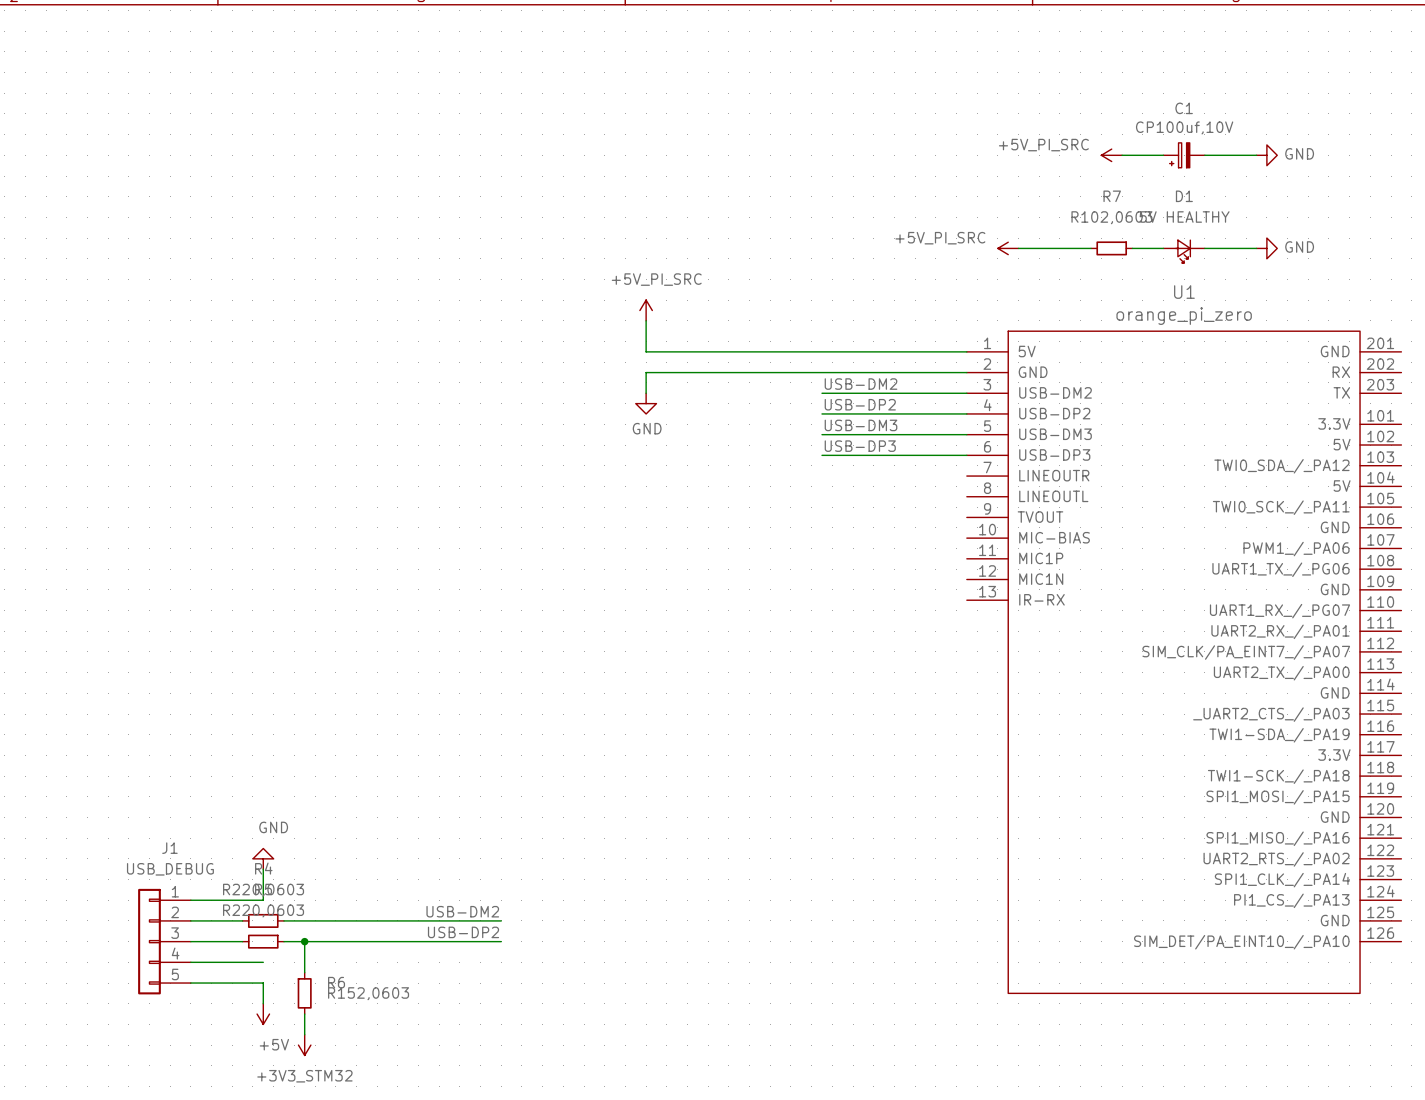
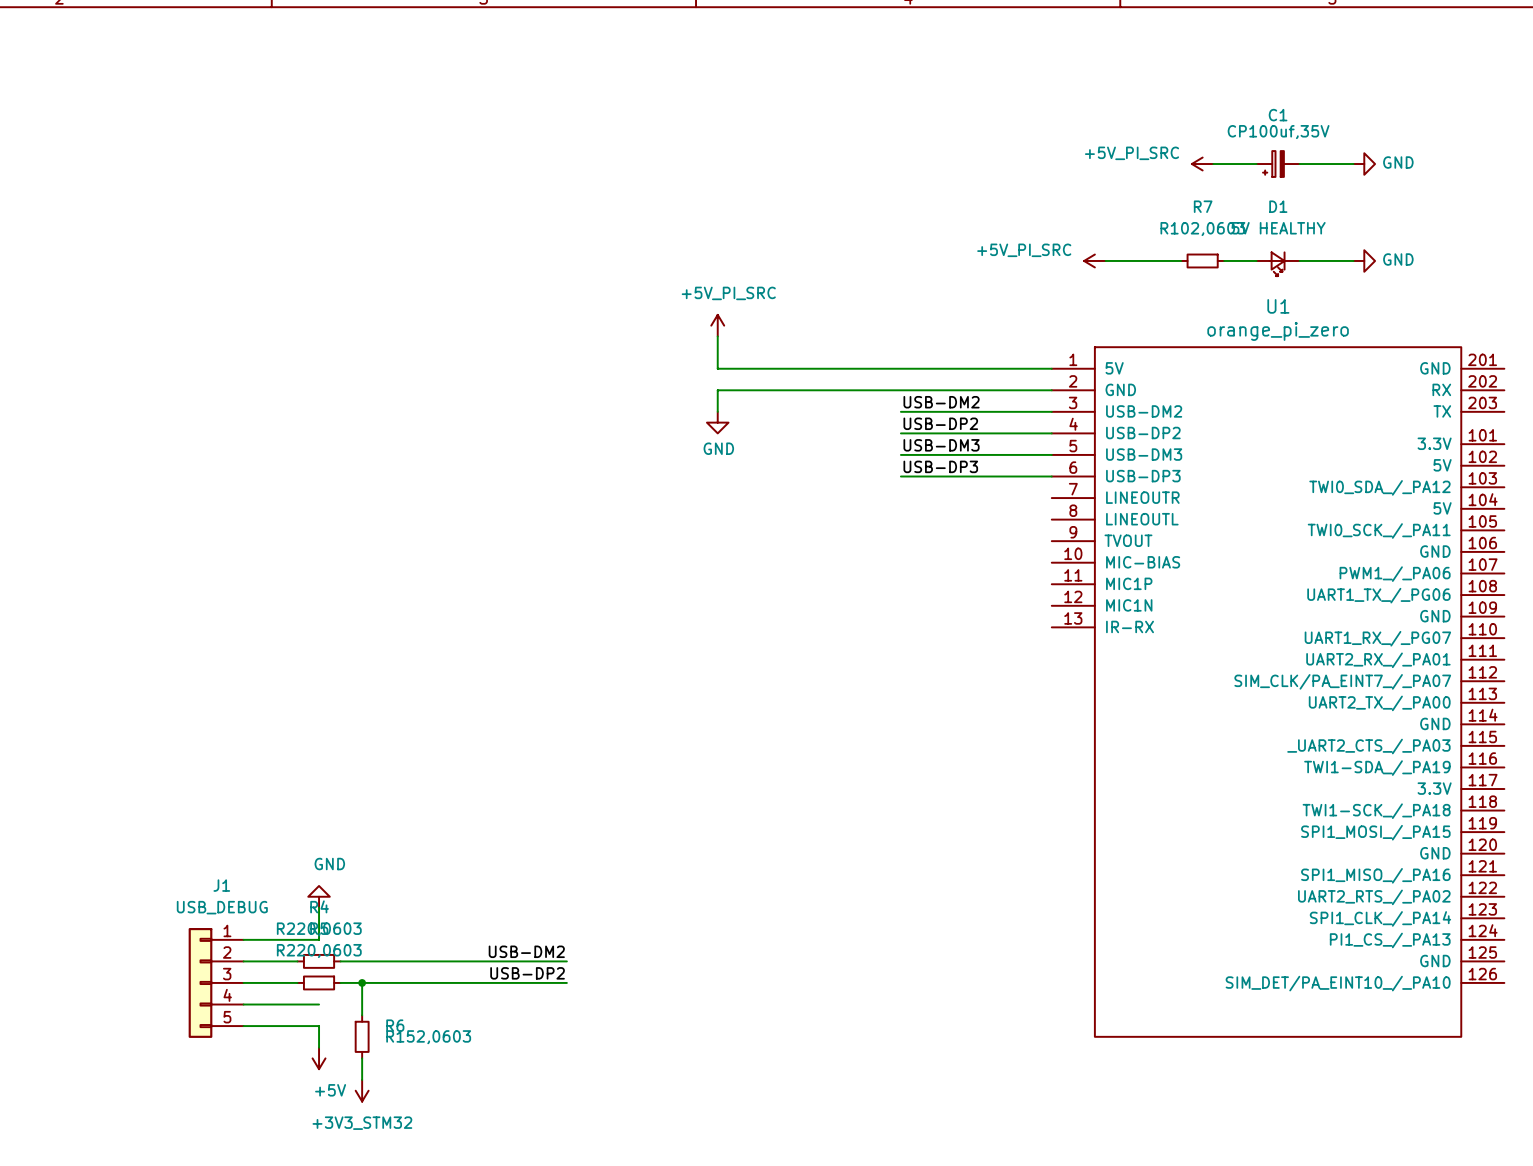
C1 value: CP100uf,10V (1184, 127) -> CP100uf,35V (1278, 132)

